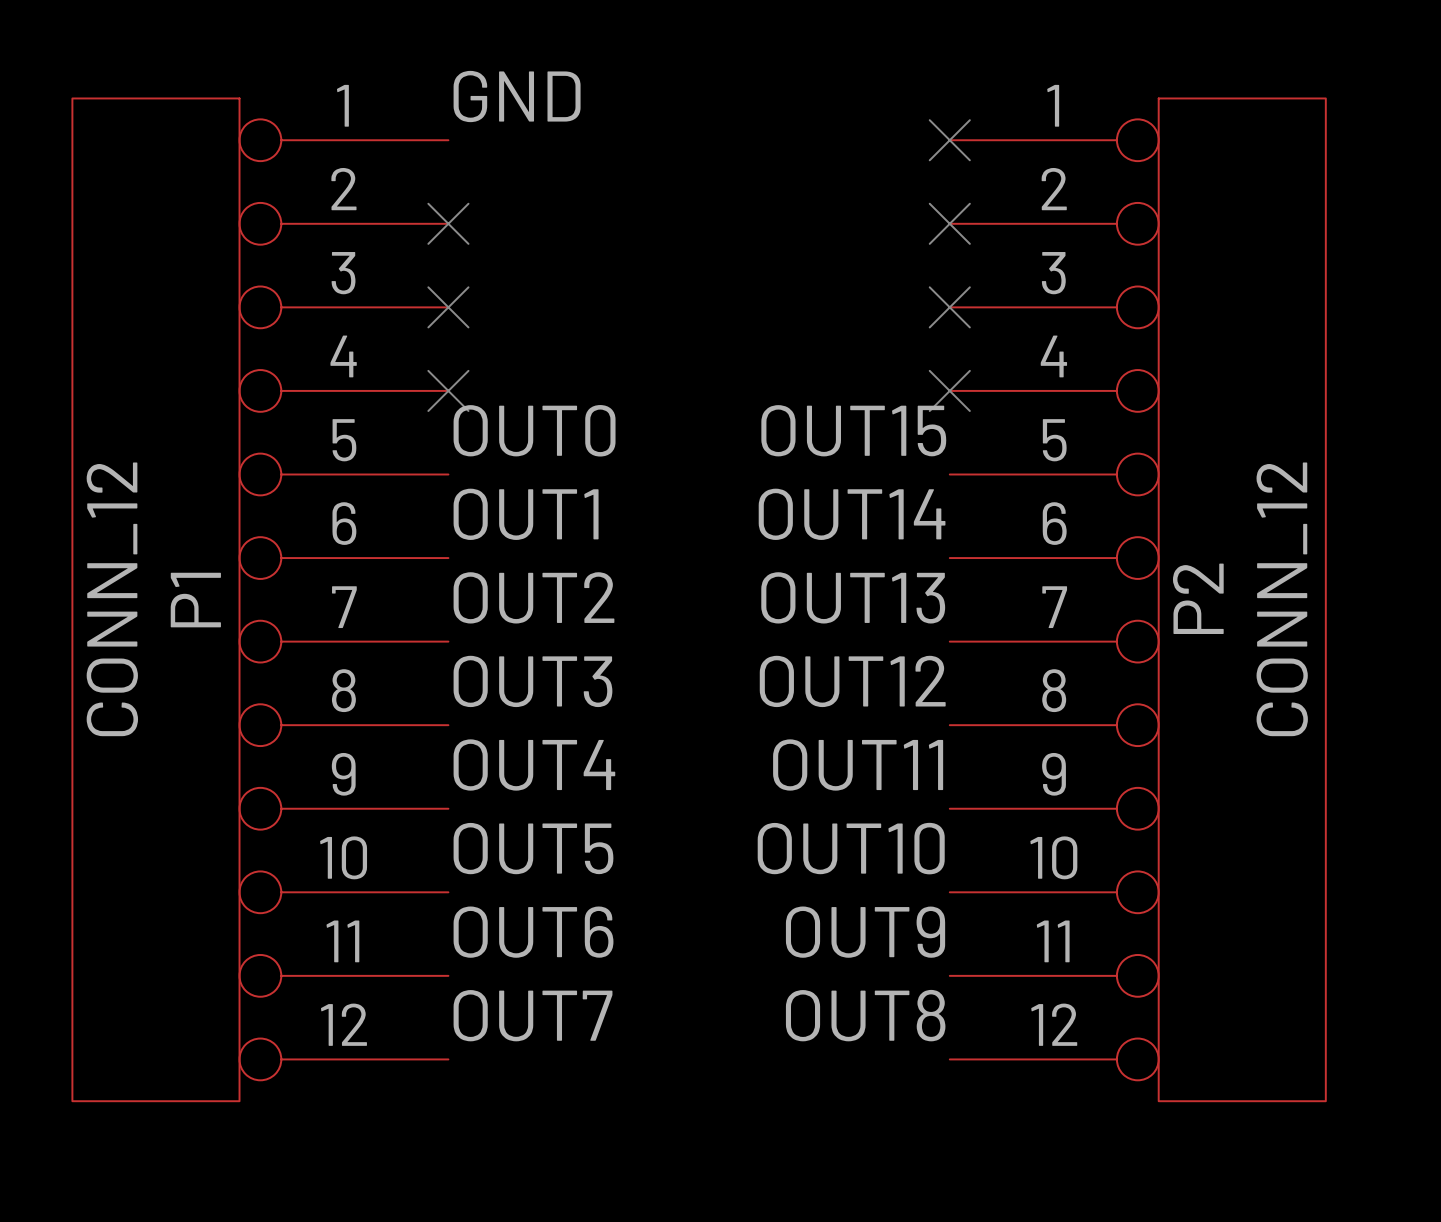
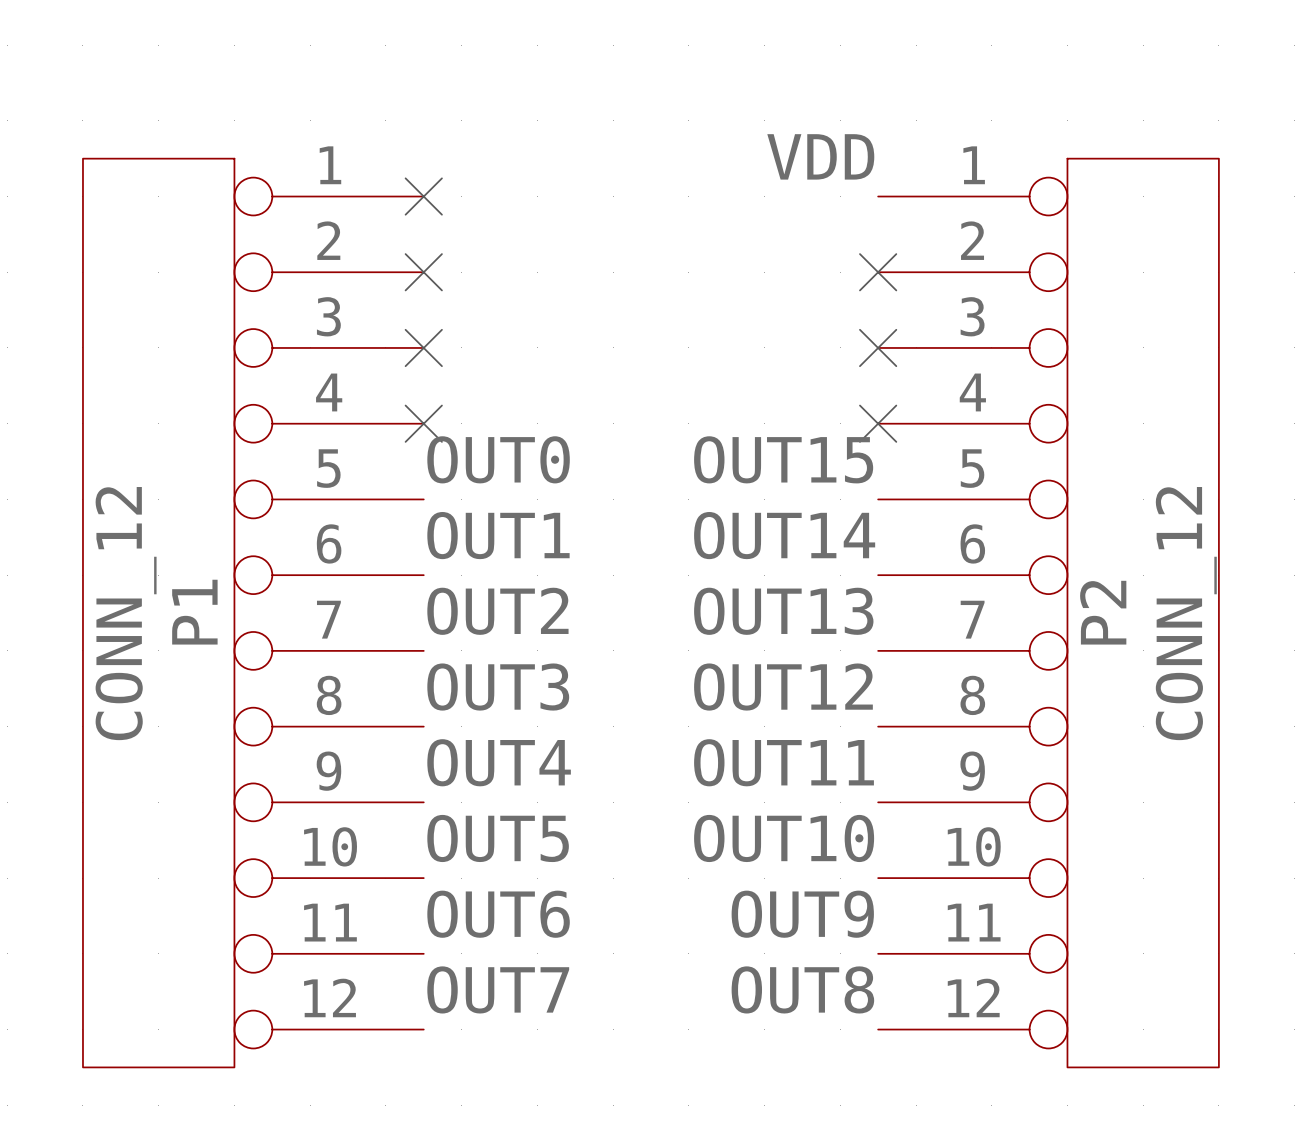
label: GND (517, 96) -> none
label: none -> VDD (820, 156)
no-connect mark: none -> (423, 196)
no-connect mark: (949, 140) -> none

